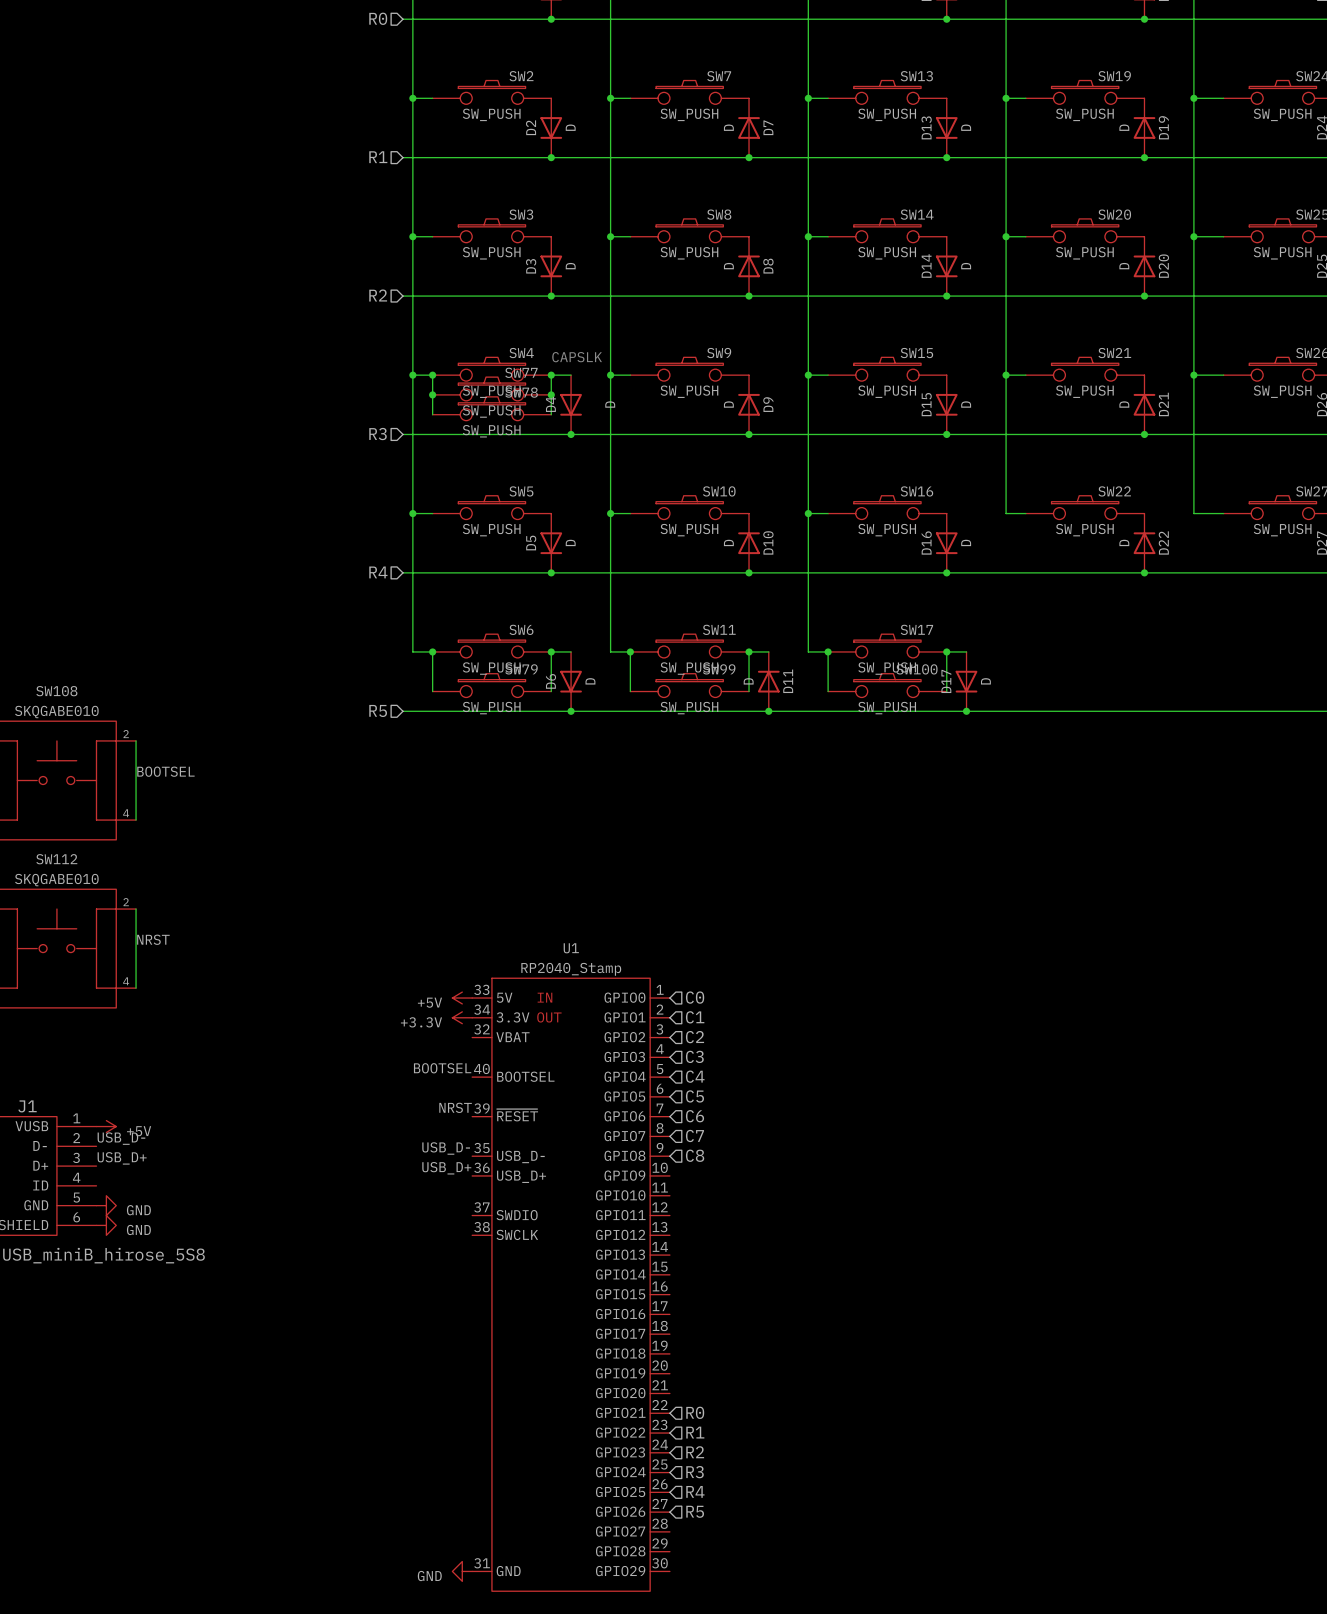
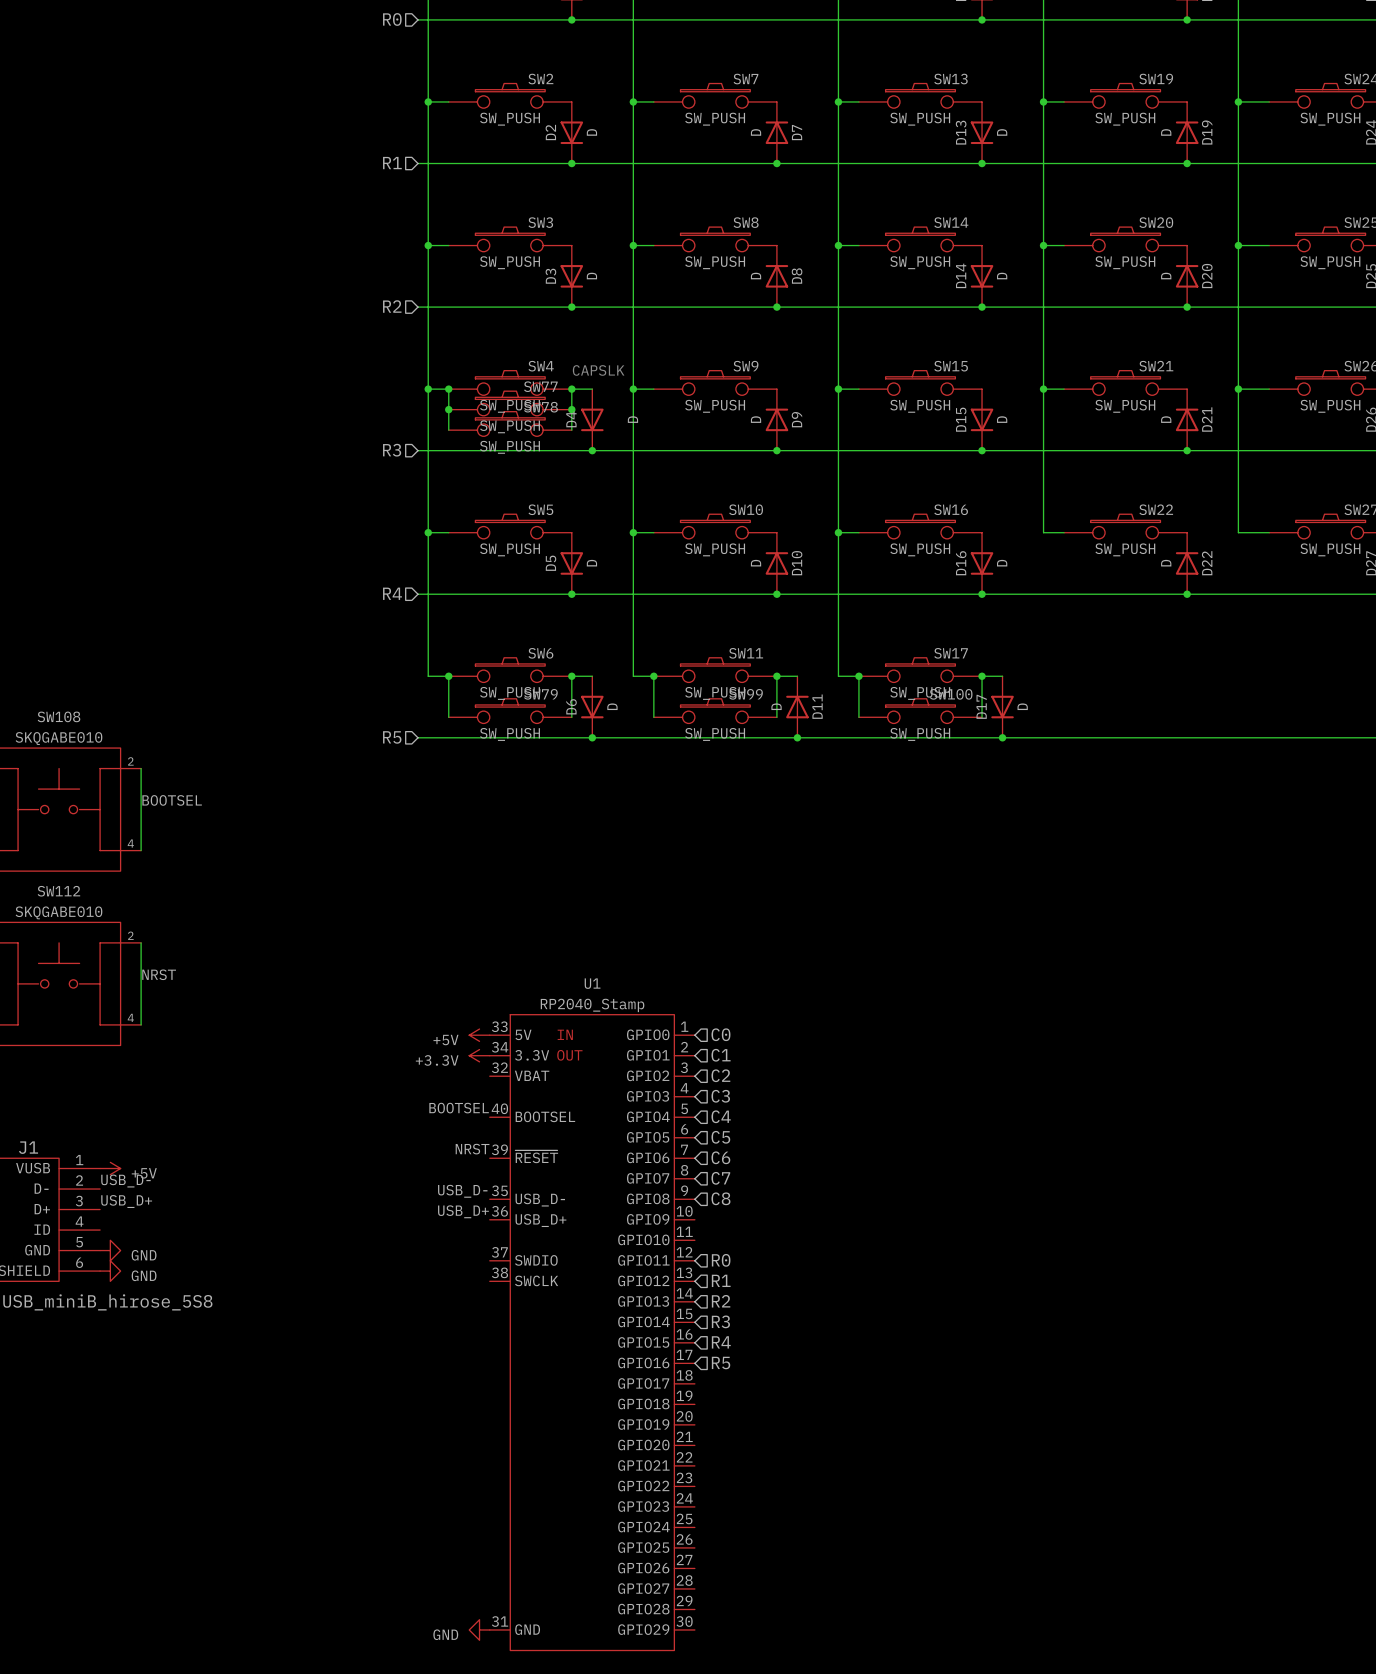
hierarchical label: none -> R0 (721, 1260)
hierarchical label: none -> R1 (721, 1280)
hierarchical label: none -> R2 (721, 1301)
hierarchical label: none -> R3 (720, 1321)
hierarchical label: none -> R4 (721, 1342)
hierarchical label: none -> R5 (721, 1363)
hierarchical label: R0 (695, 1412) -> none
hierarchical label: R1 (695, 1432) -> none
hierarchical label: R2 (695, 1452) -> none
hierarchical label: R3 (695, 1472) -> none
hierarchical label: R4 (695, 1491) -> none
hierarchical label: R5 (695, 1511) -> none

